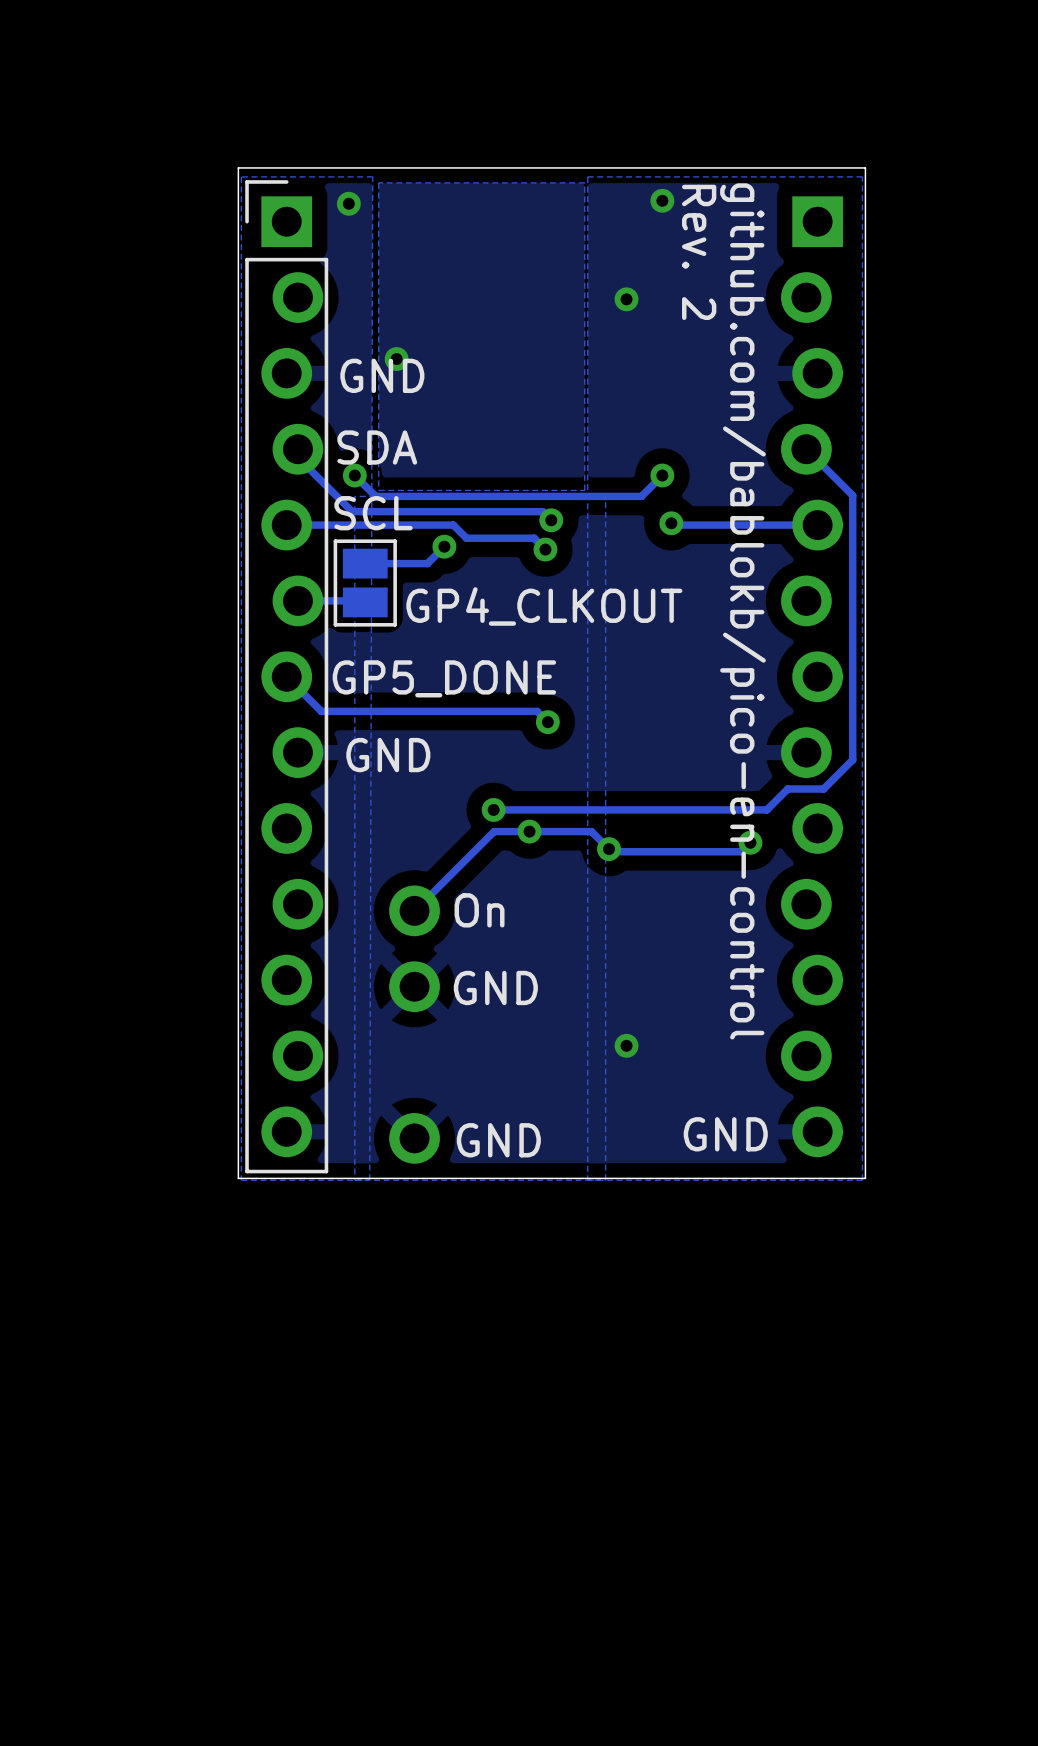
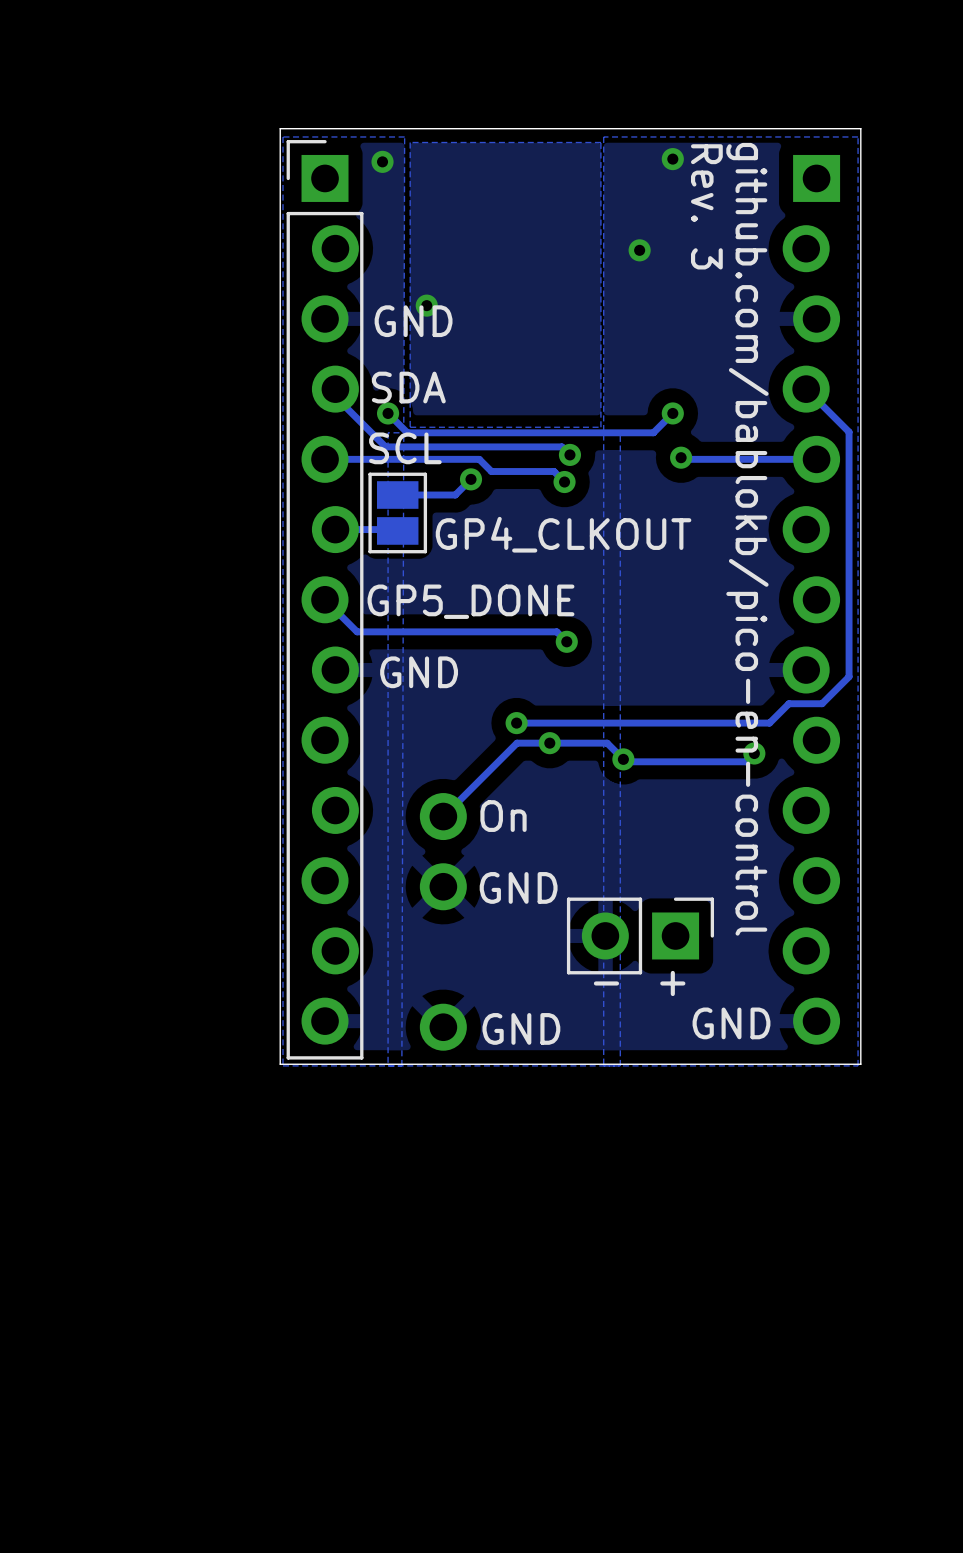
text: Rev. 2 (699, 252) -> Rev. 3 (706, 206)
part: none -> (640, 935)
via: (626, 1045) -> none
text: none -> - (606, 983)
text: none -> + (672, 983)

